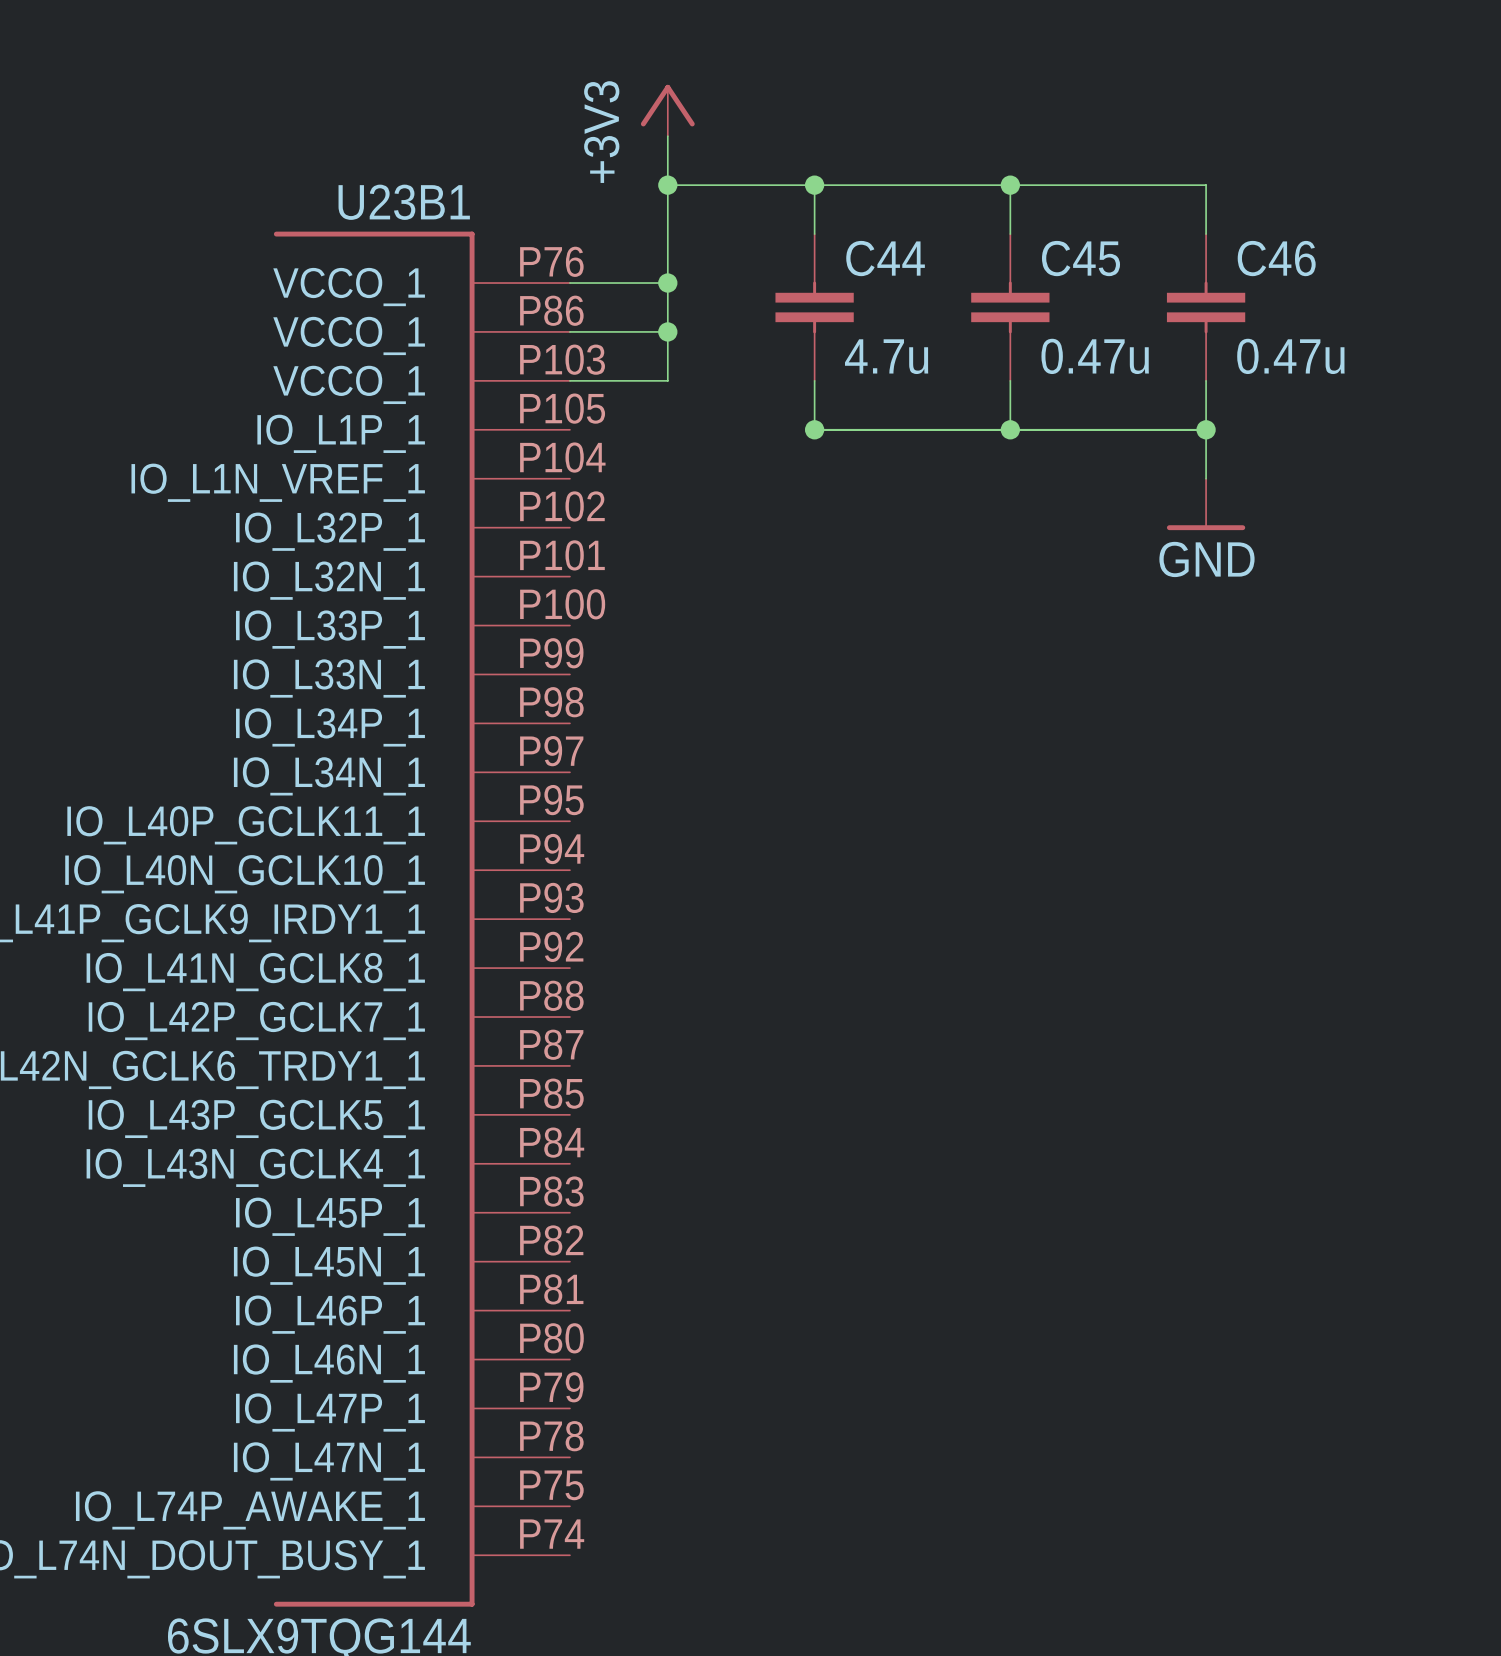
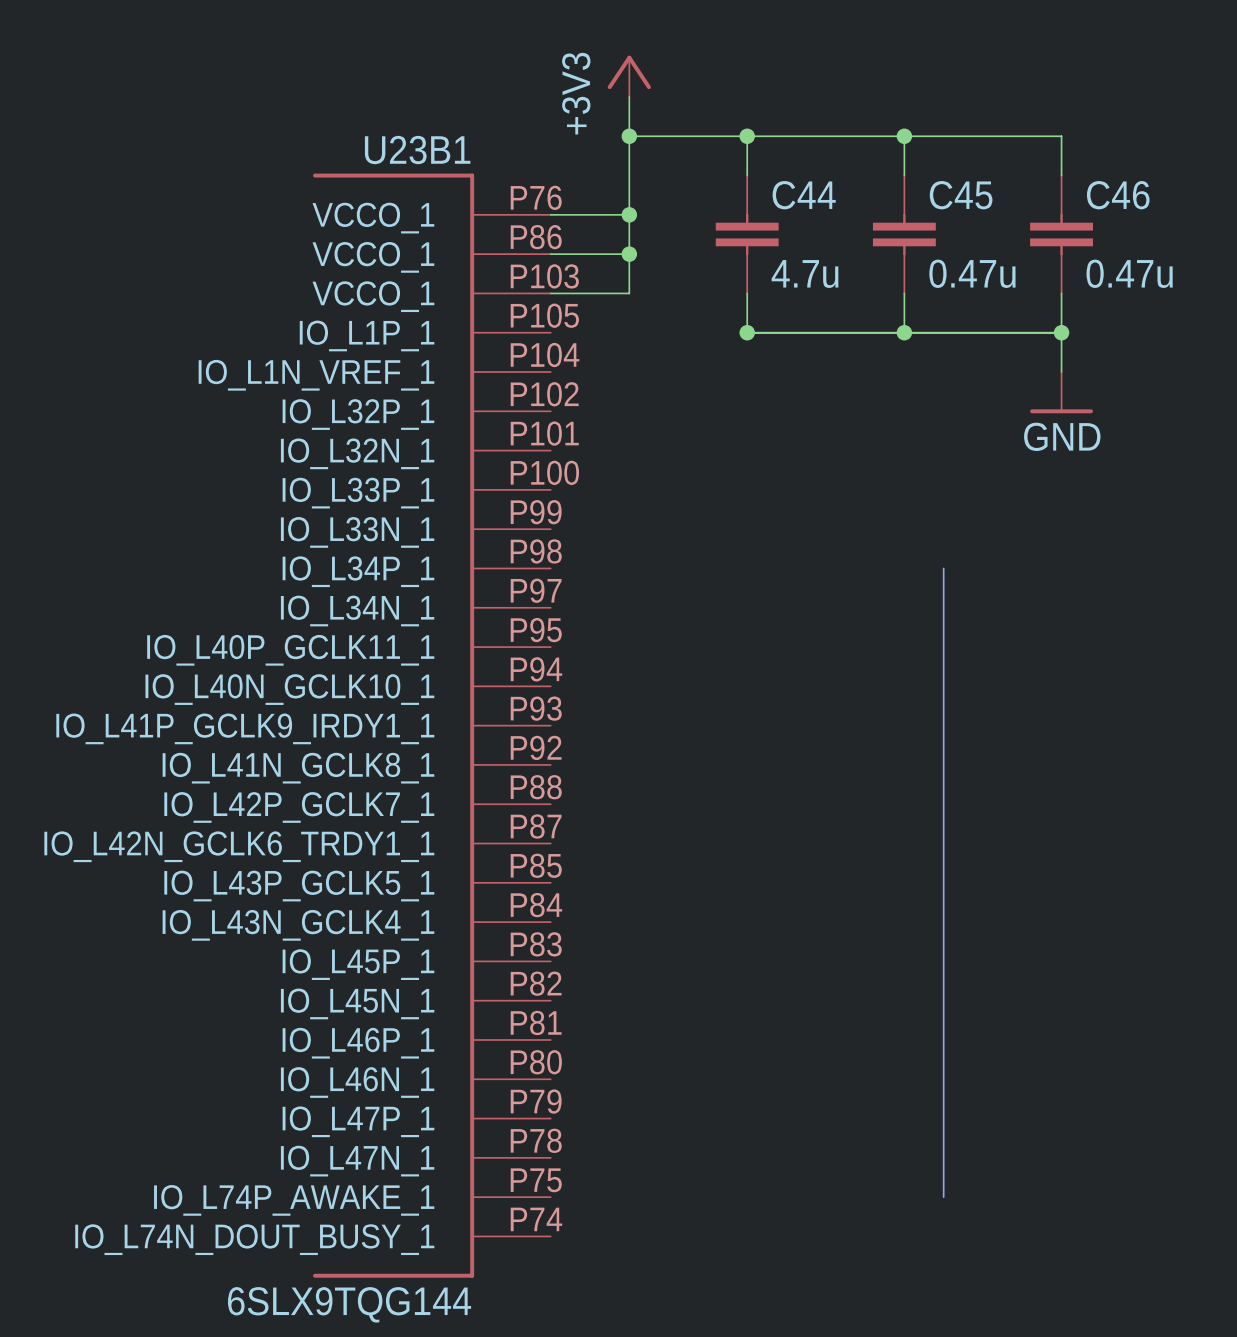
bus: none -> (943, 568) (943, 1197)

